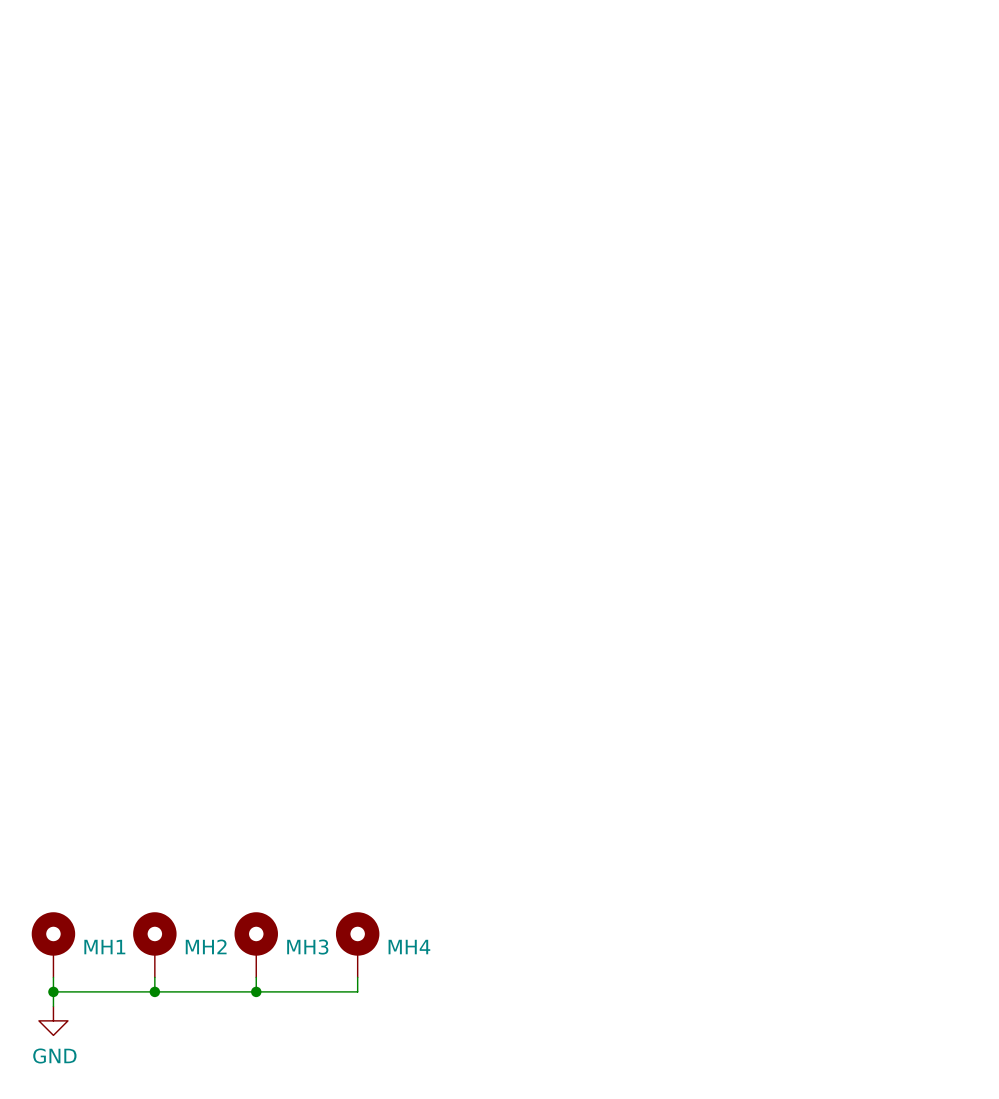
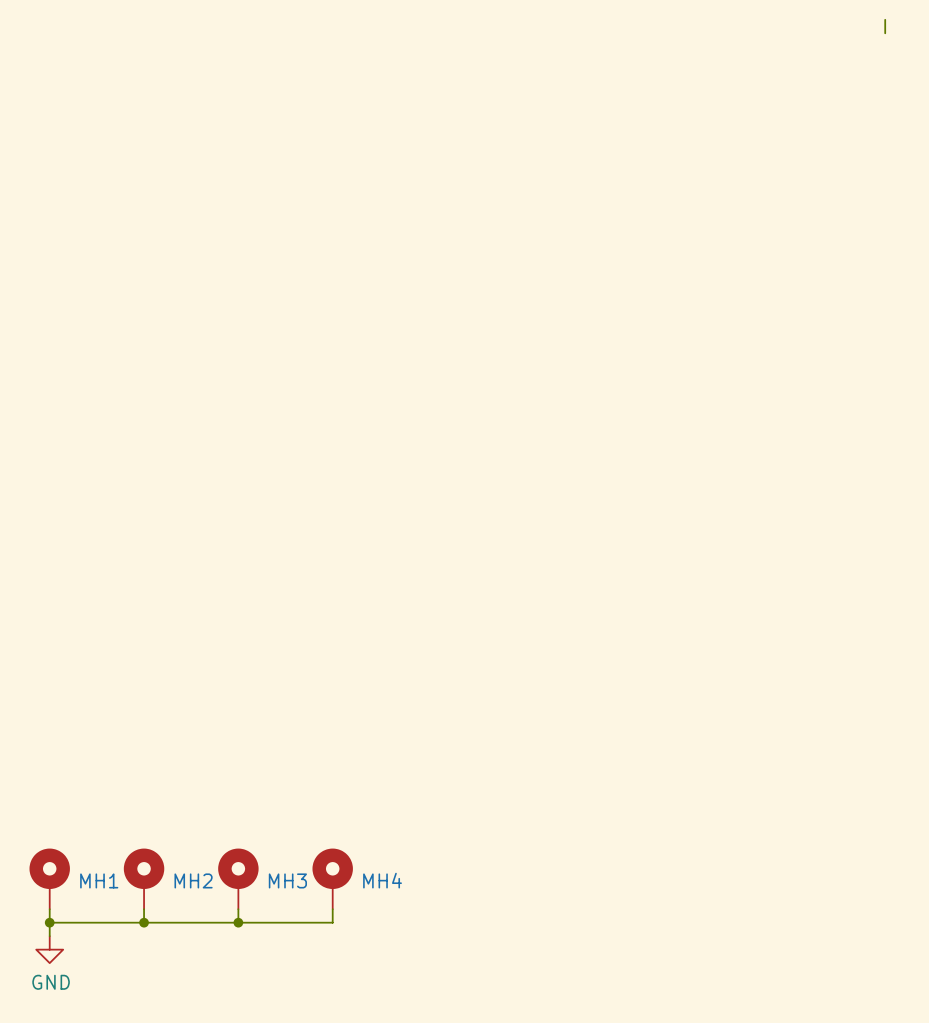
wire: none -> (885, 19) (885, 33)

